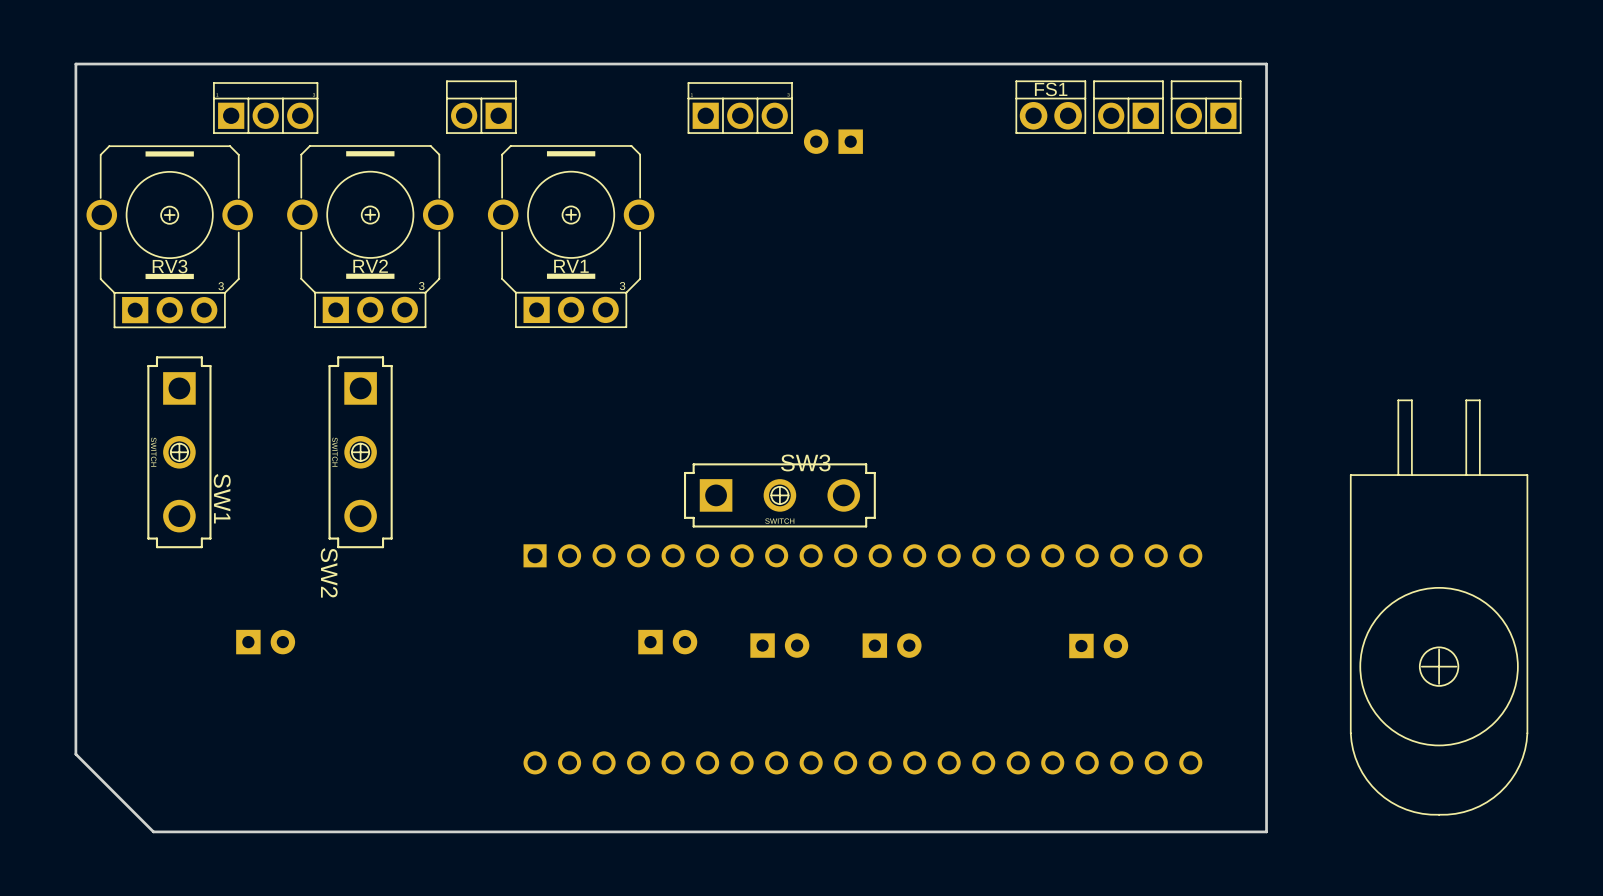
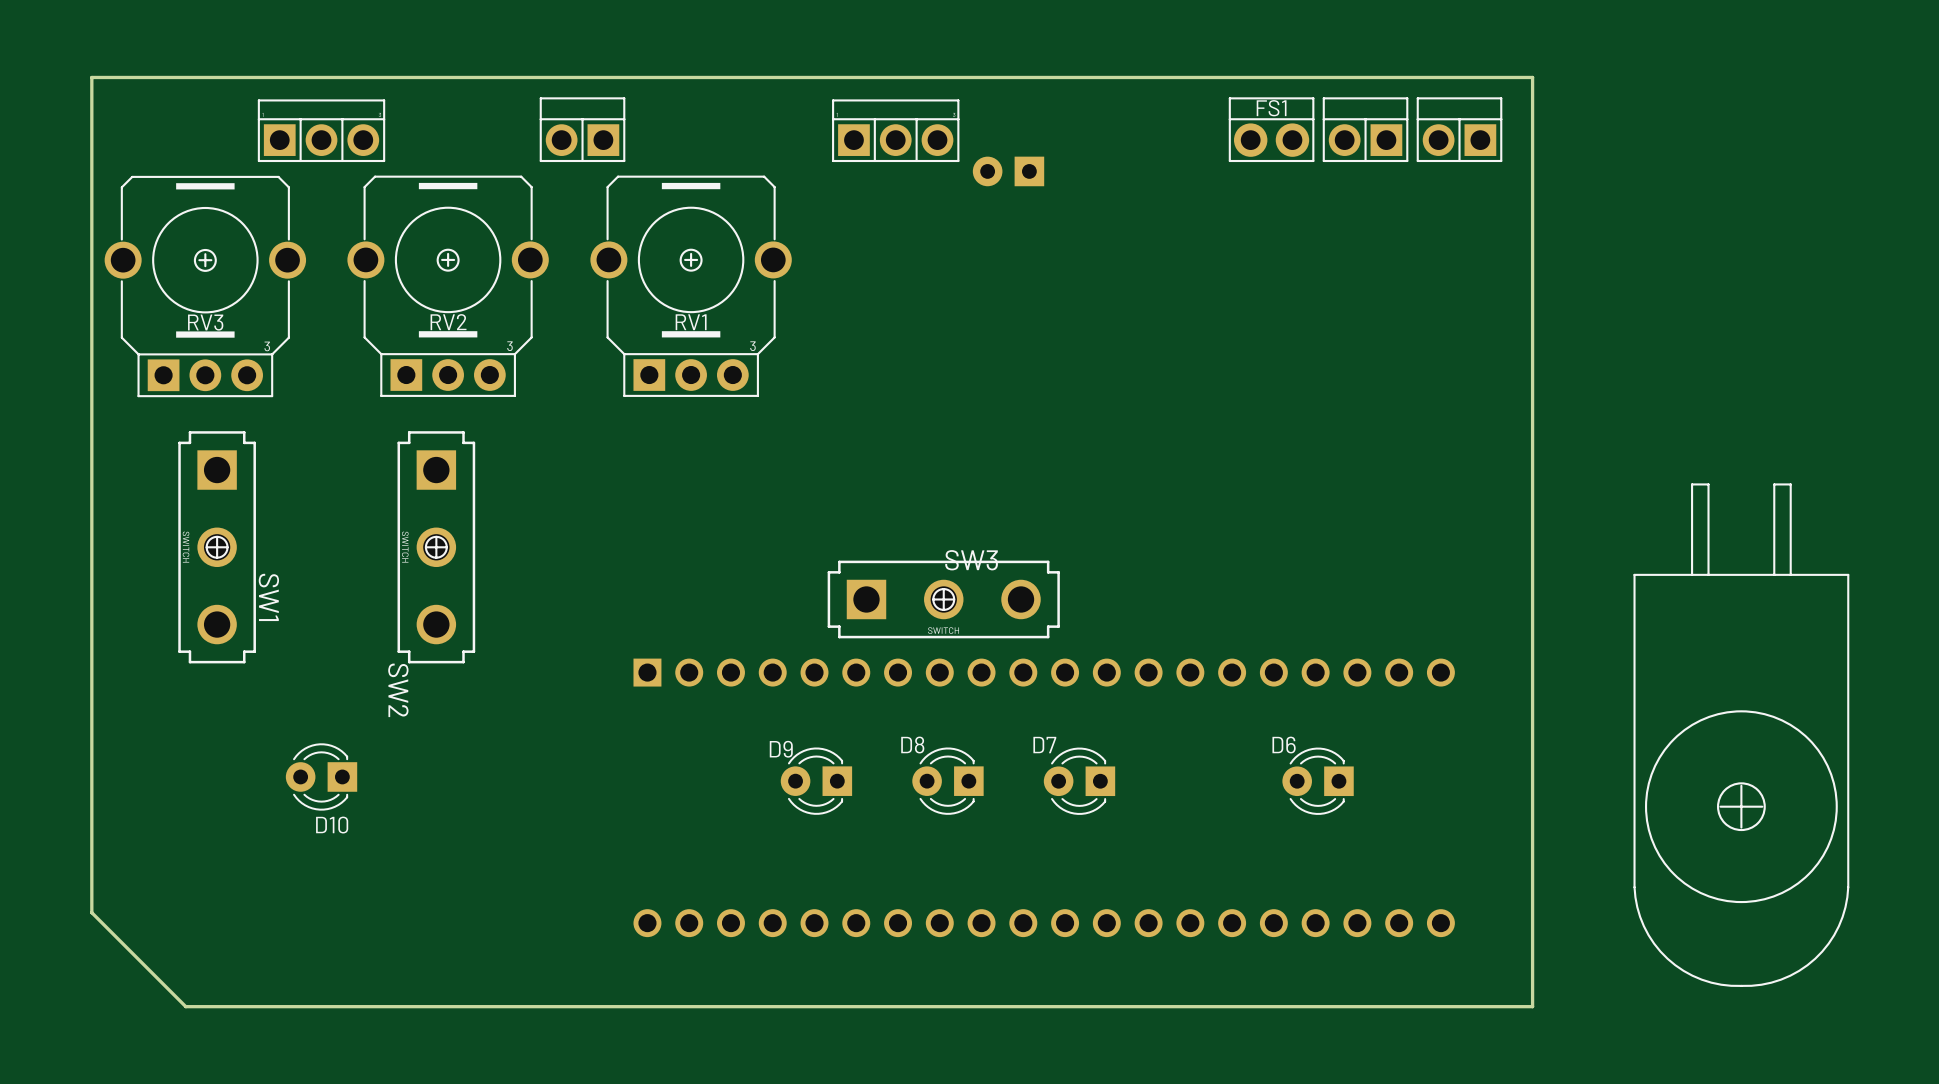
D10 side: top (265, 642) -> bottom (321, 776)
D9 side: top (667, 642) -> bottom (816, 781)
D8 side: top (779, 645) -> bottom (947, 781)
D7 side: top (892, 645) -> bottom (1079, 781)
D6 side: top (1098, 645) -> bottom (1318, 781)

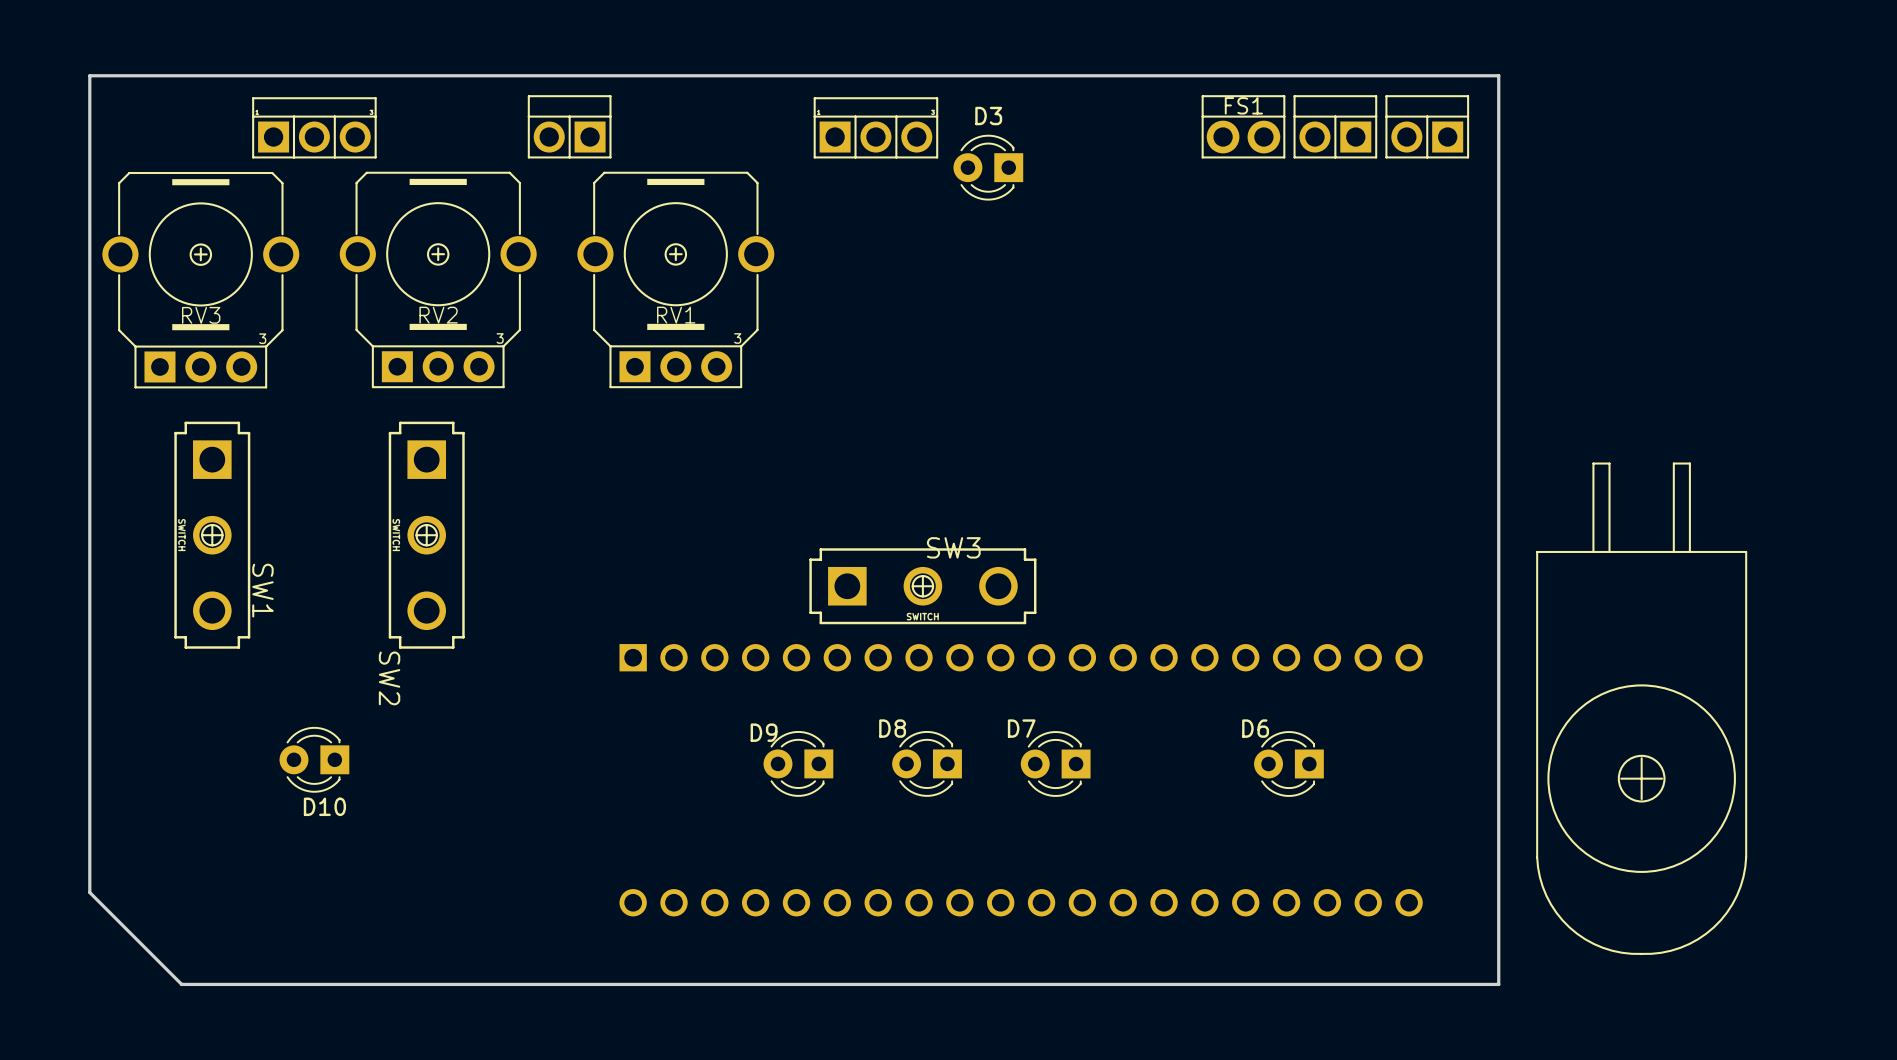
D3 side: top (1008, 171) -> bottom (988, 167)
drawing position: (1741, 735) -> (1641, 708)

